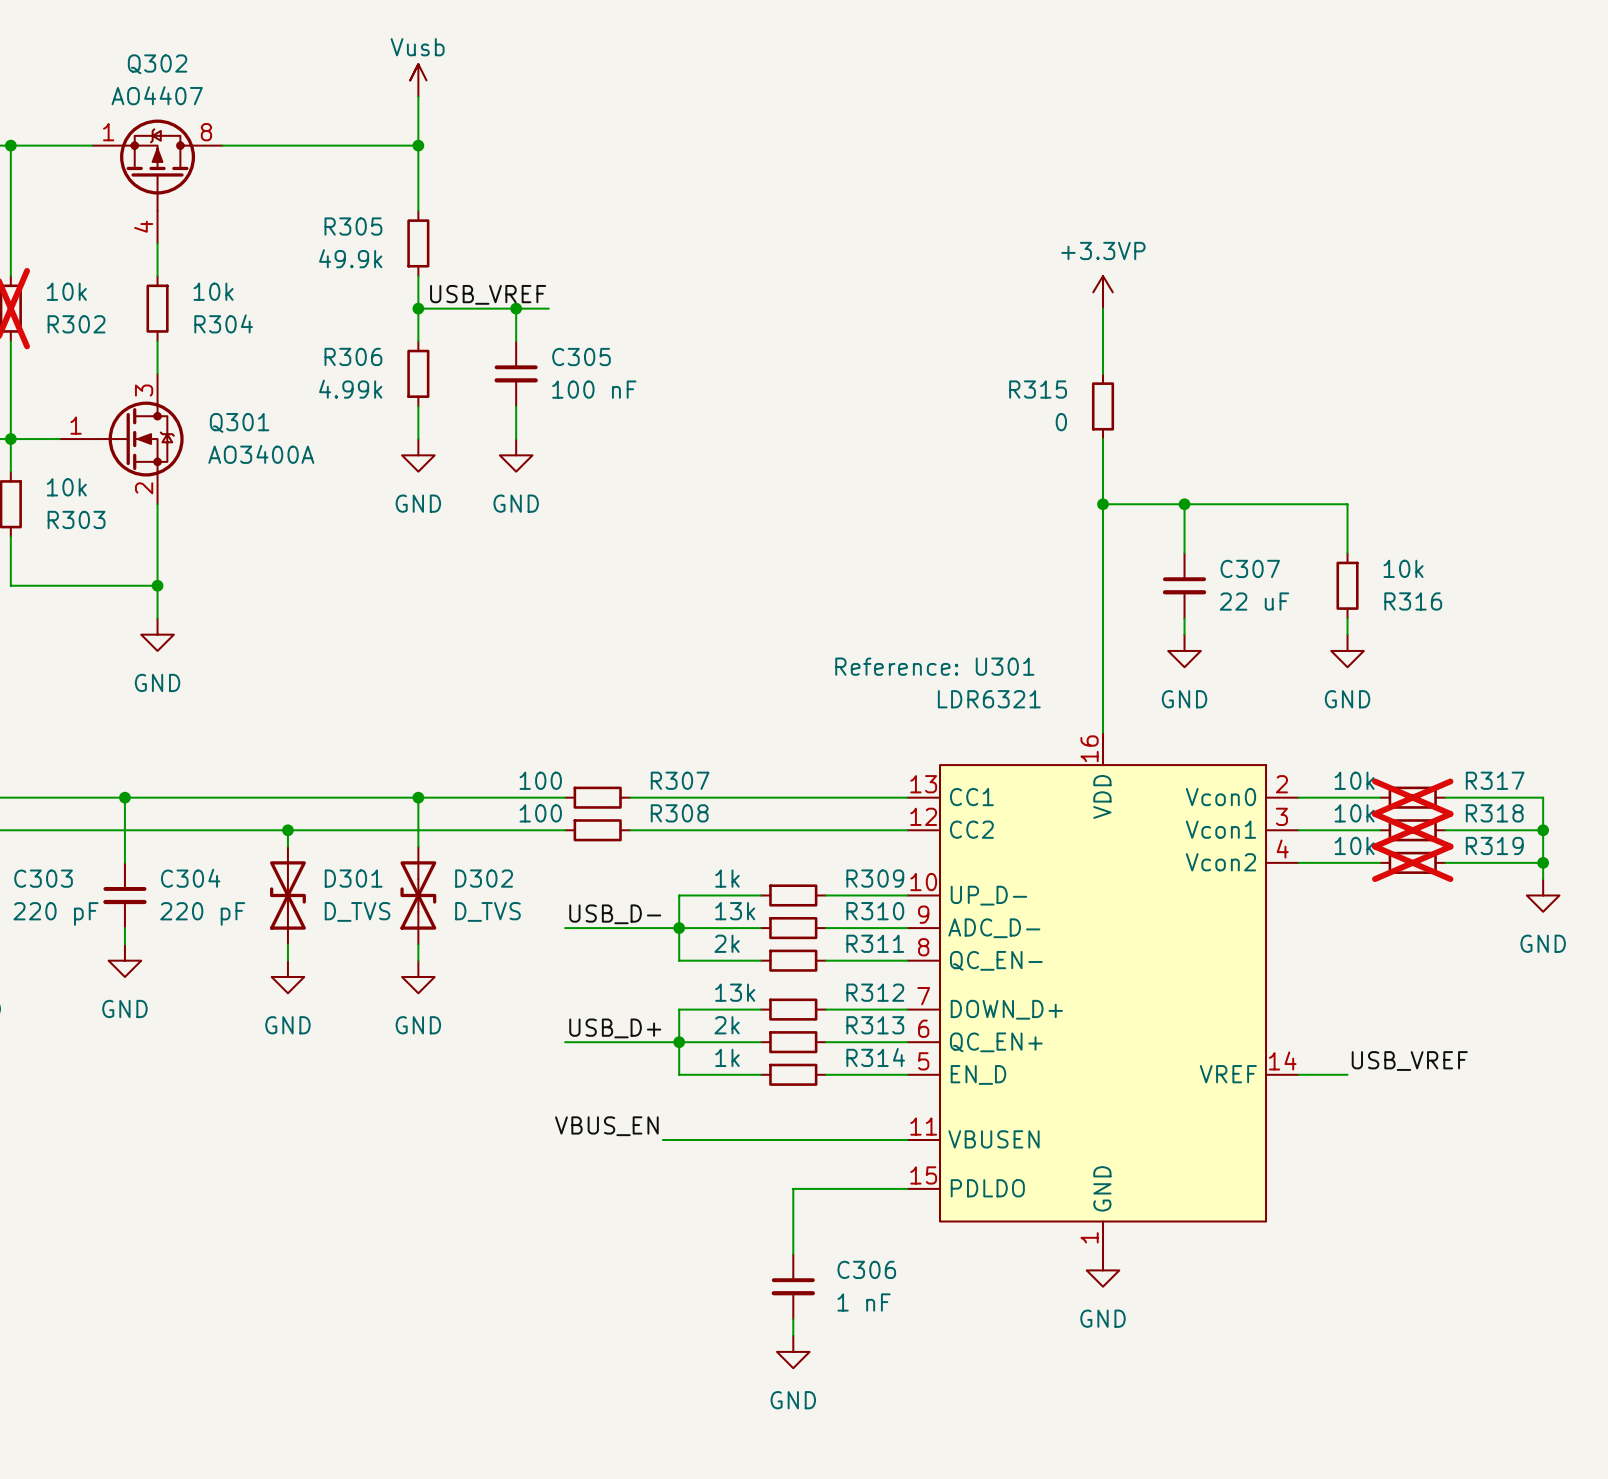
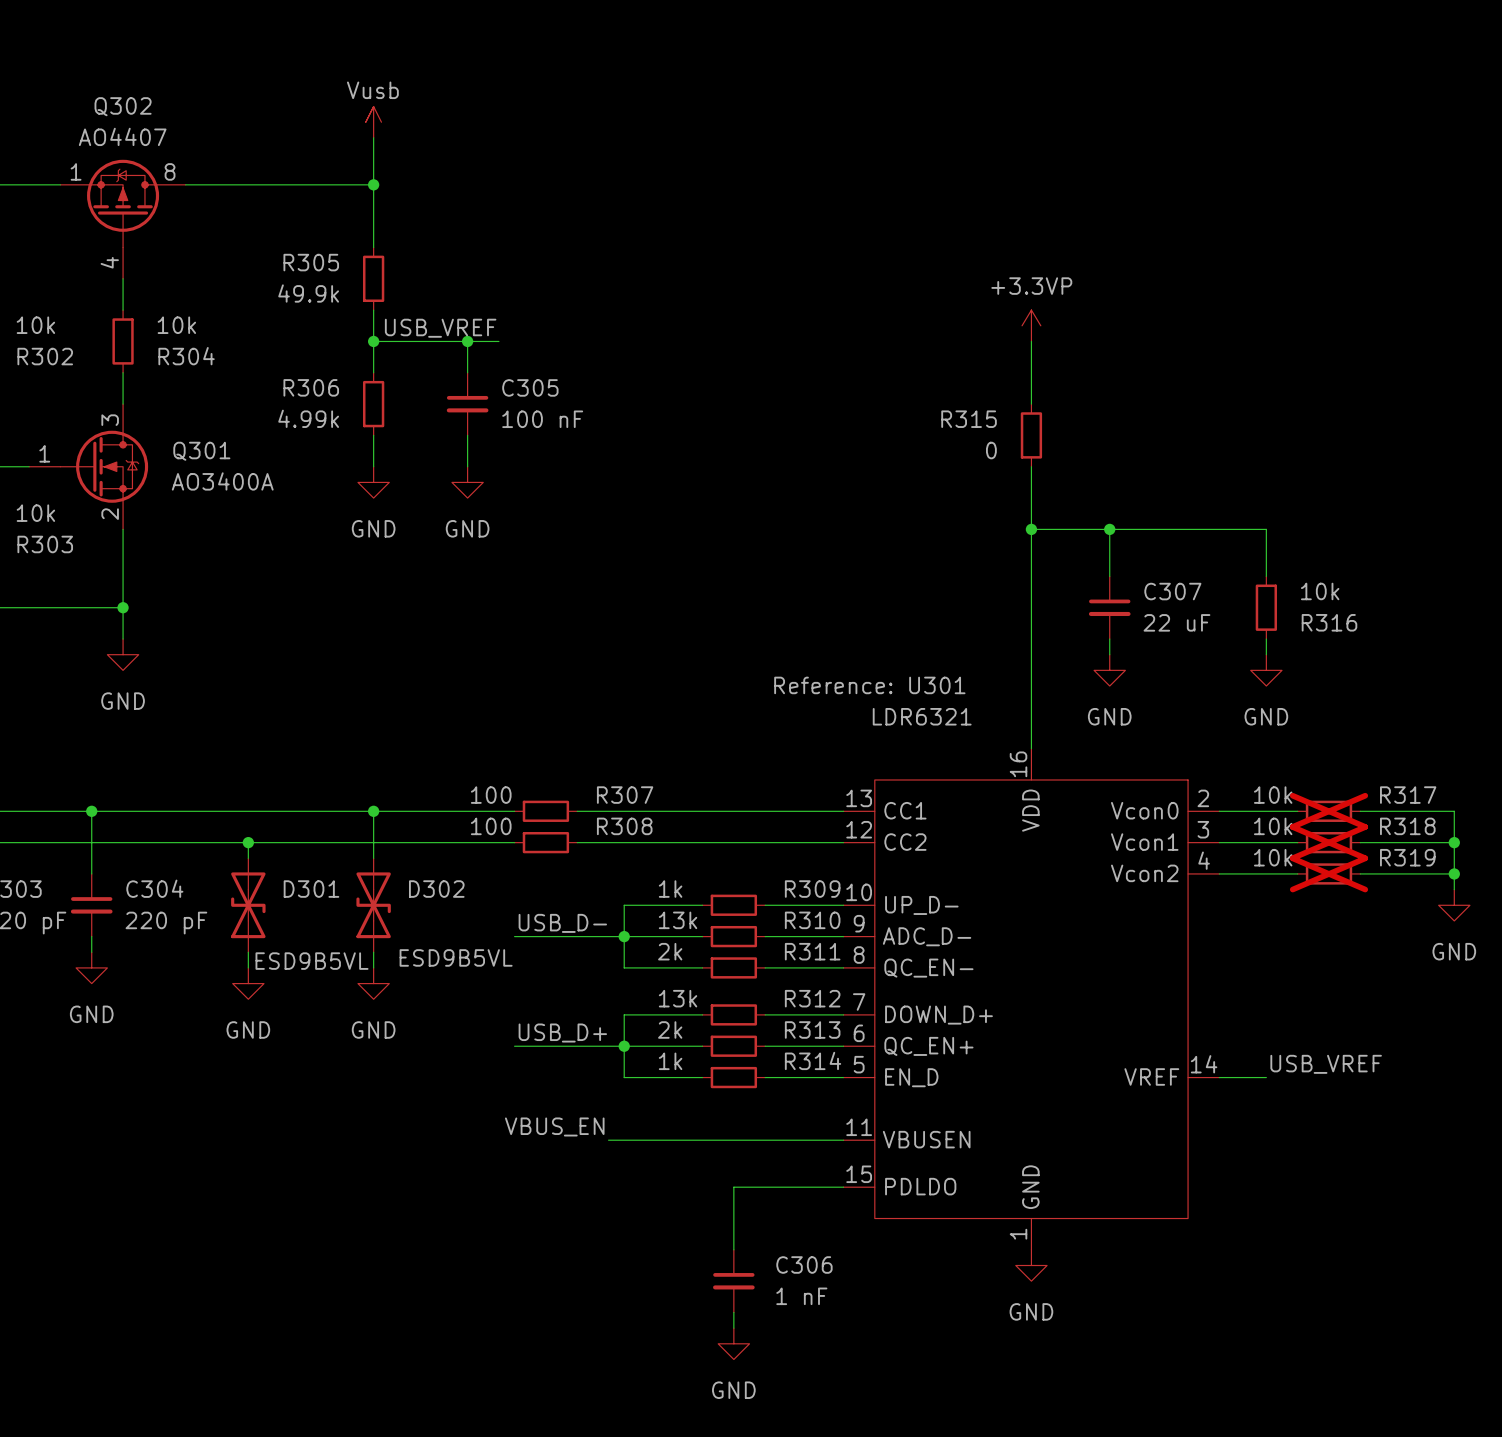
D301 value: D_TVS (357, 911) -> ESD9B5VL (312, 961)
D302 value: D_TVS (487, 911) -> ESD9B5VL (456, 957)

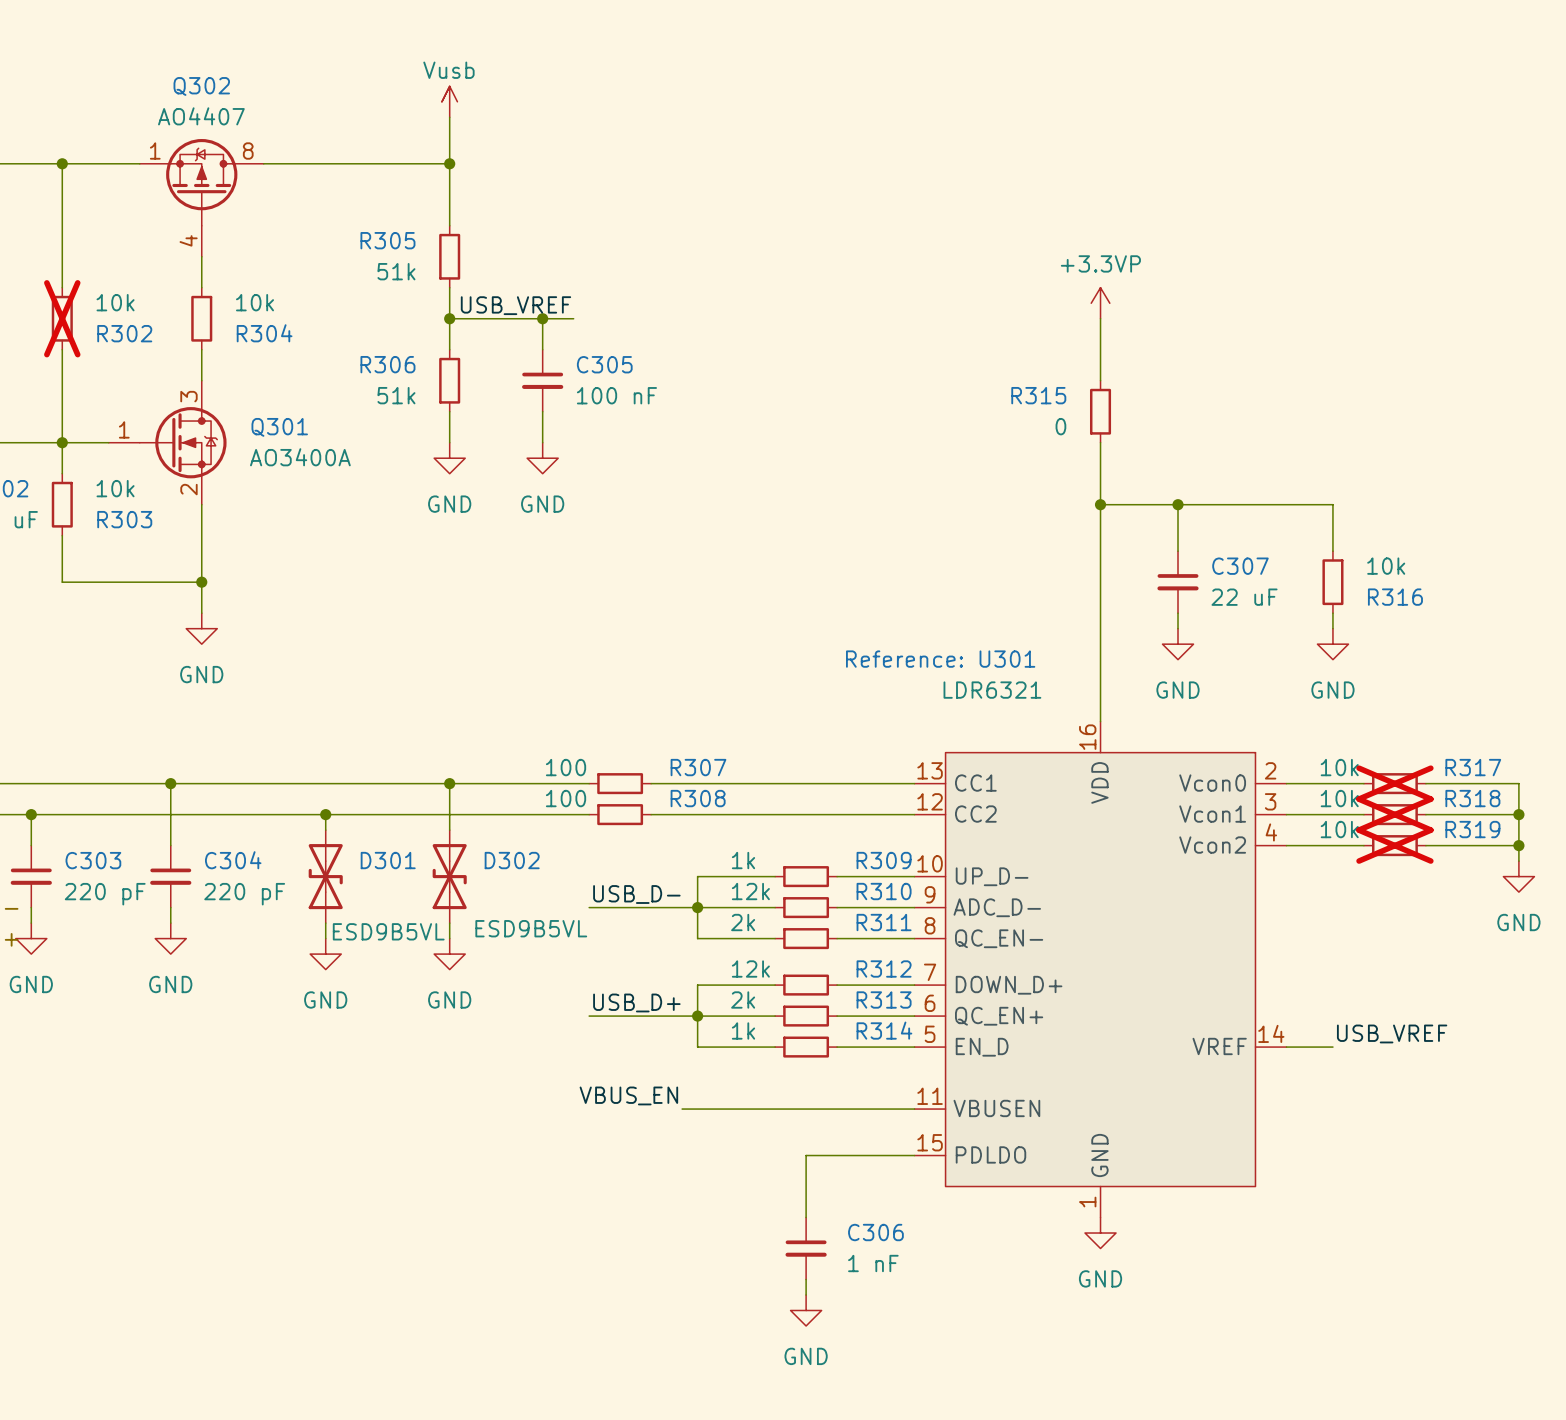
R305 value: 49.9k (308, 293) -> 51k (396, 271)
R306 value: 4.99k (308, 418) -> 51k (396, 395)
R310 value: 13k (678, 920) -> 12k (750, 891)
R312 value: 13k (678, 998) -> 12k (750, 969)

